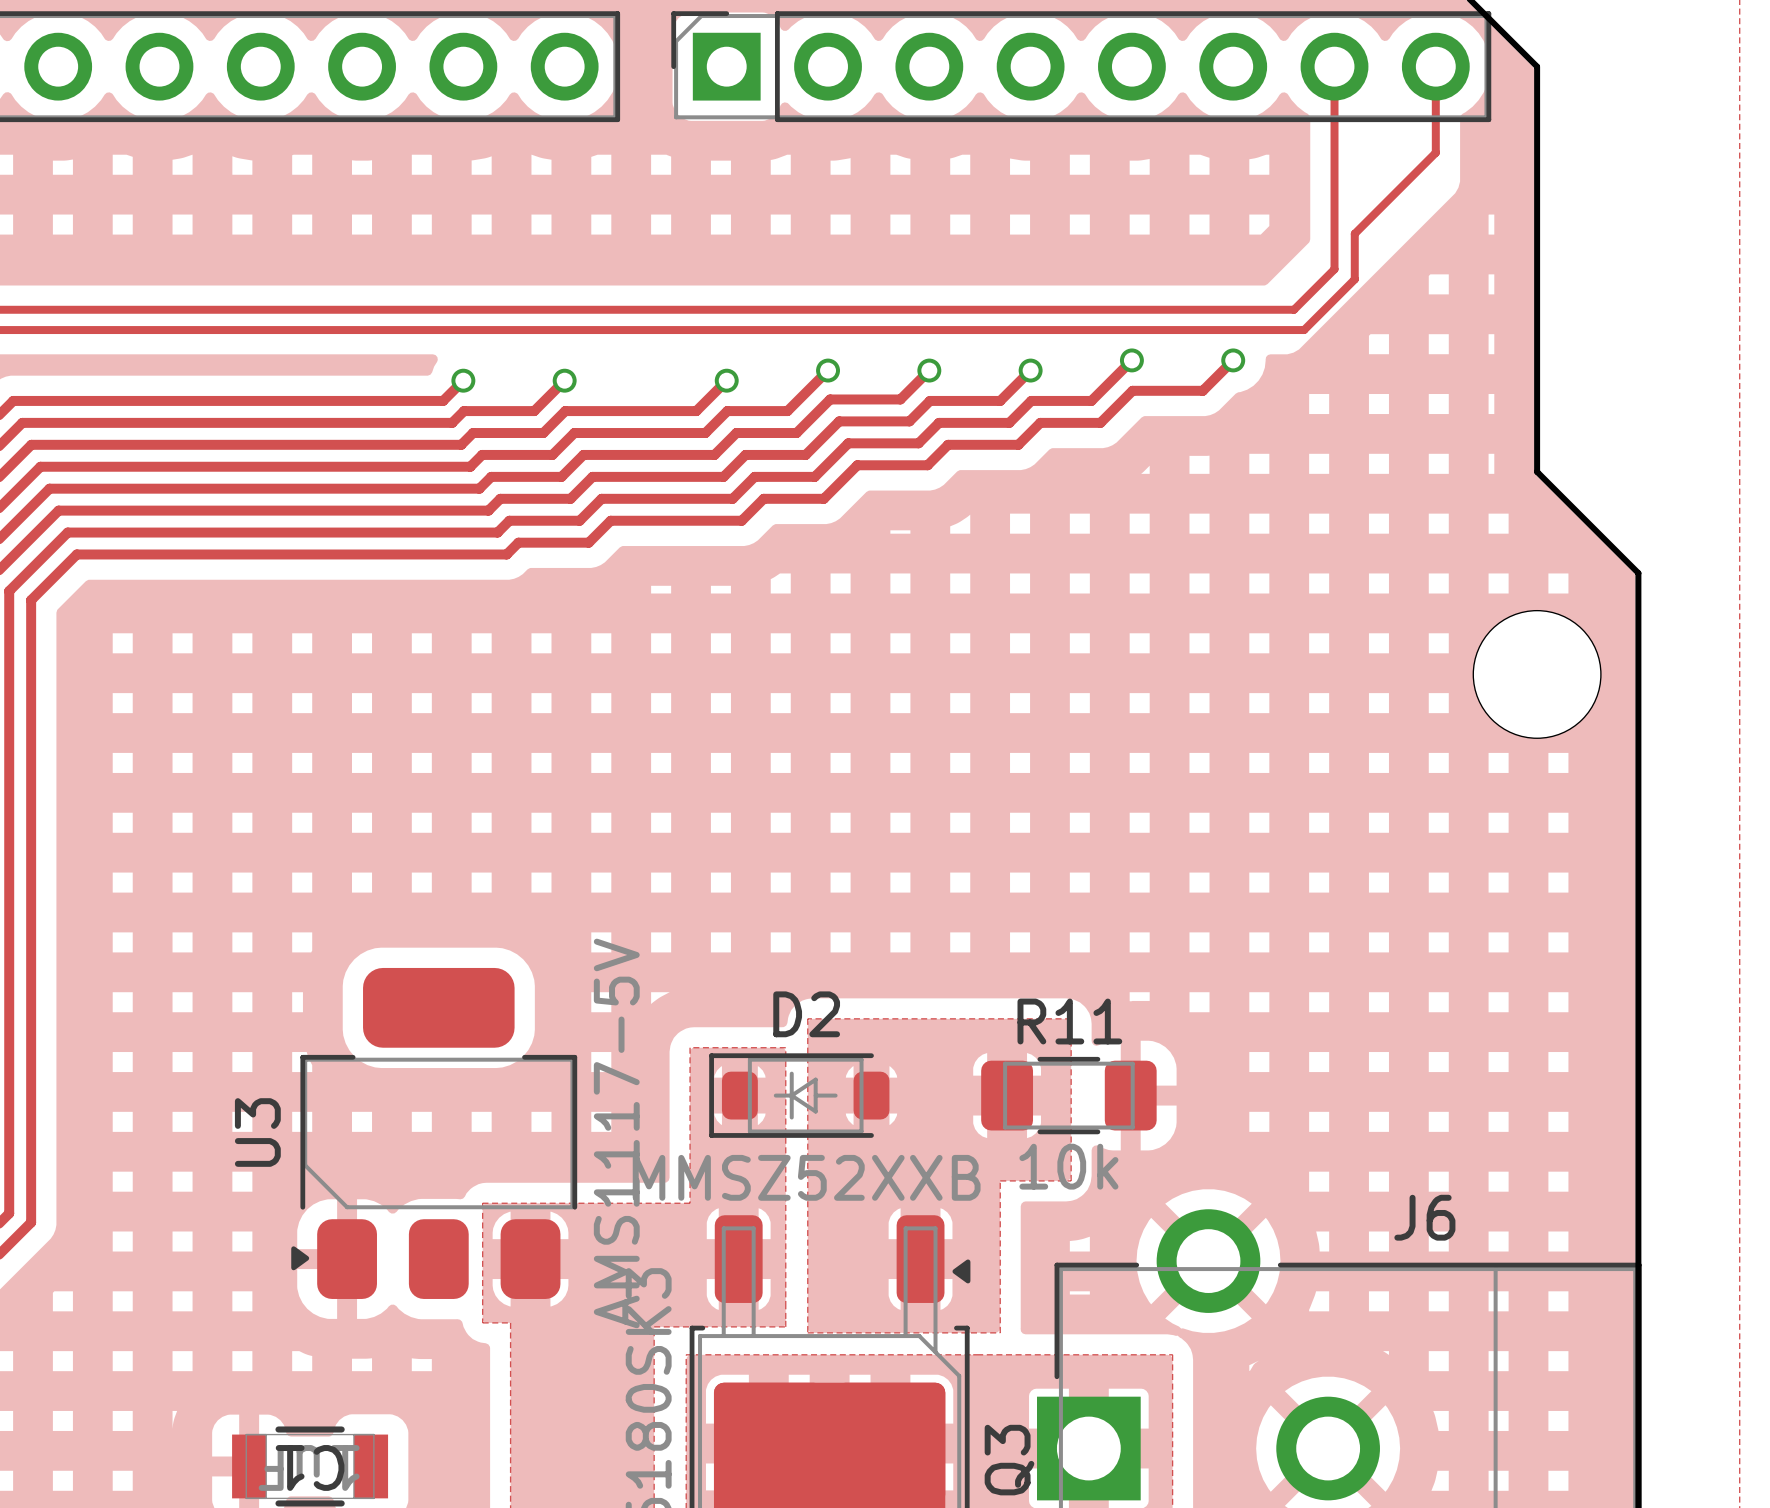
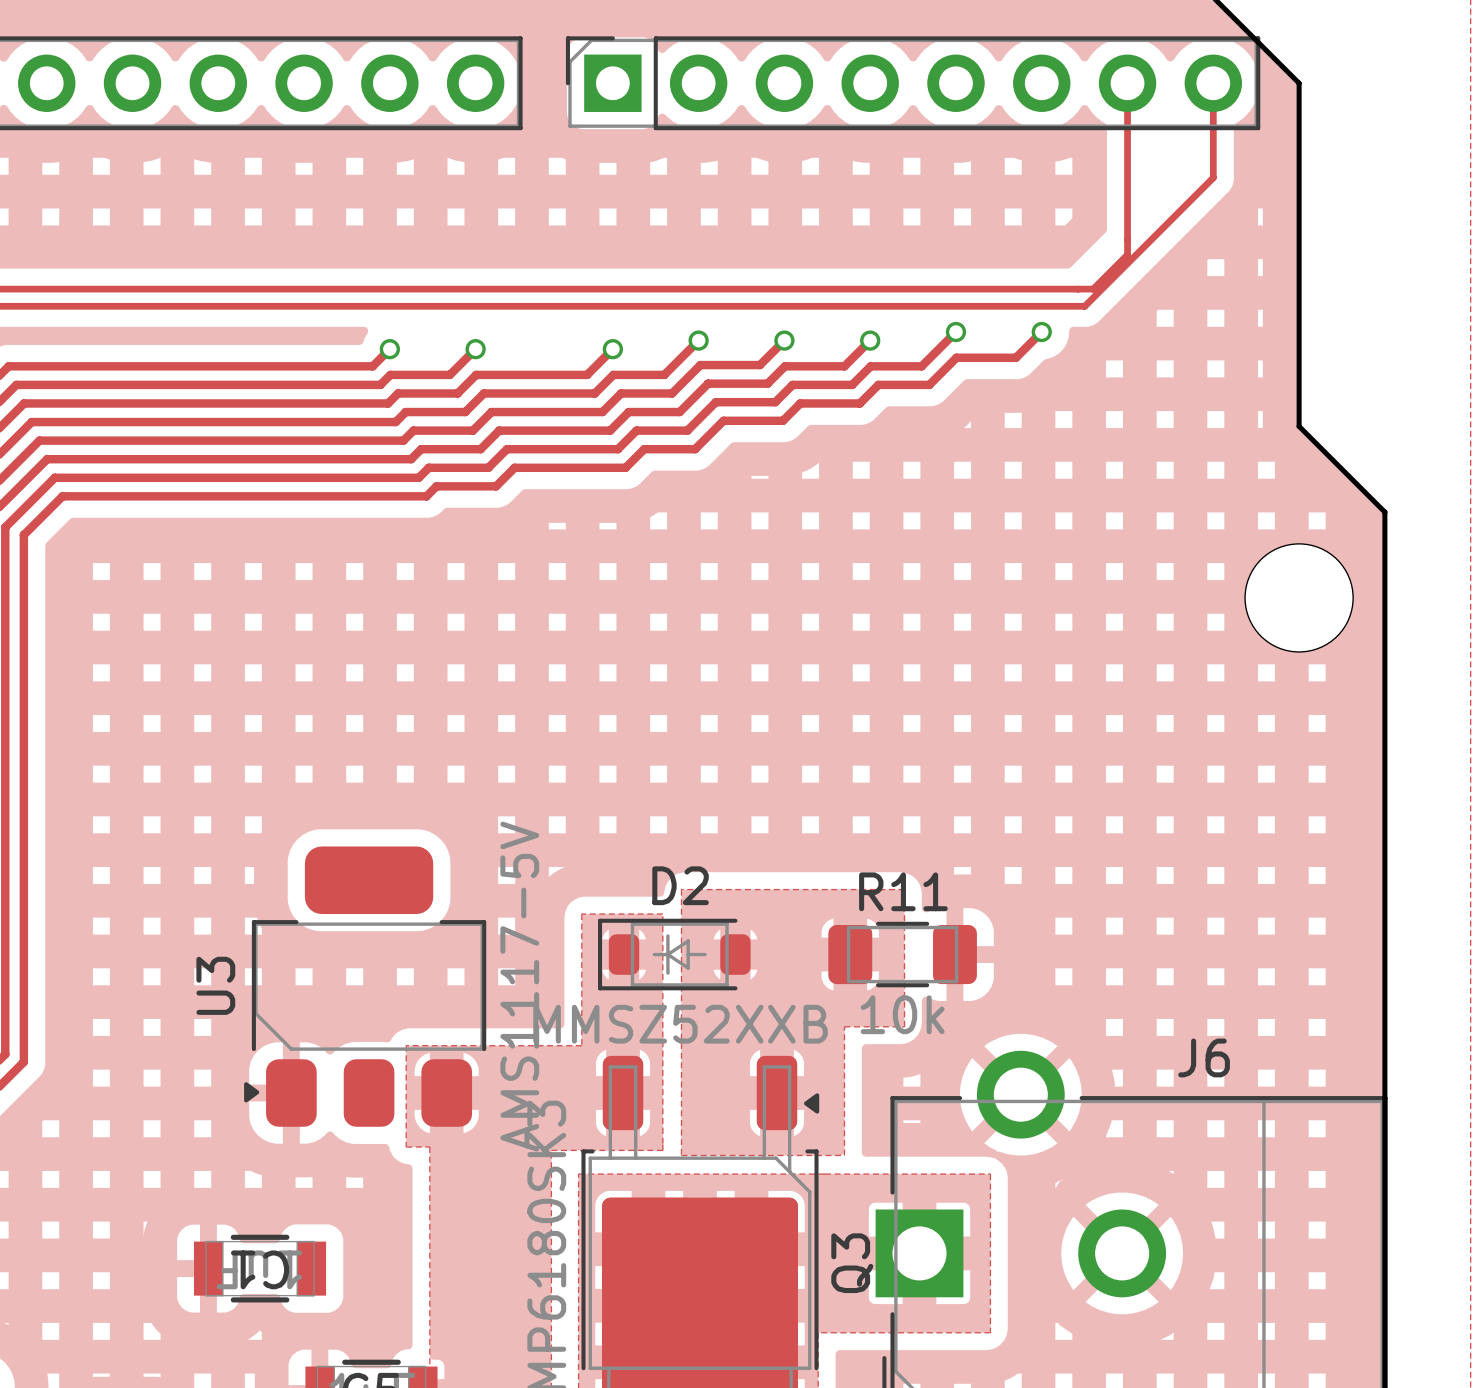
track: (1435, 152) (1354, 233) (1354, 279) (1304, 330) (1284, 330) -> (1213, 156) (1213, 177) (1084, 306)

